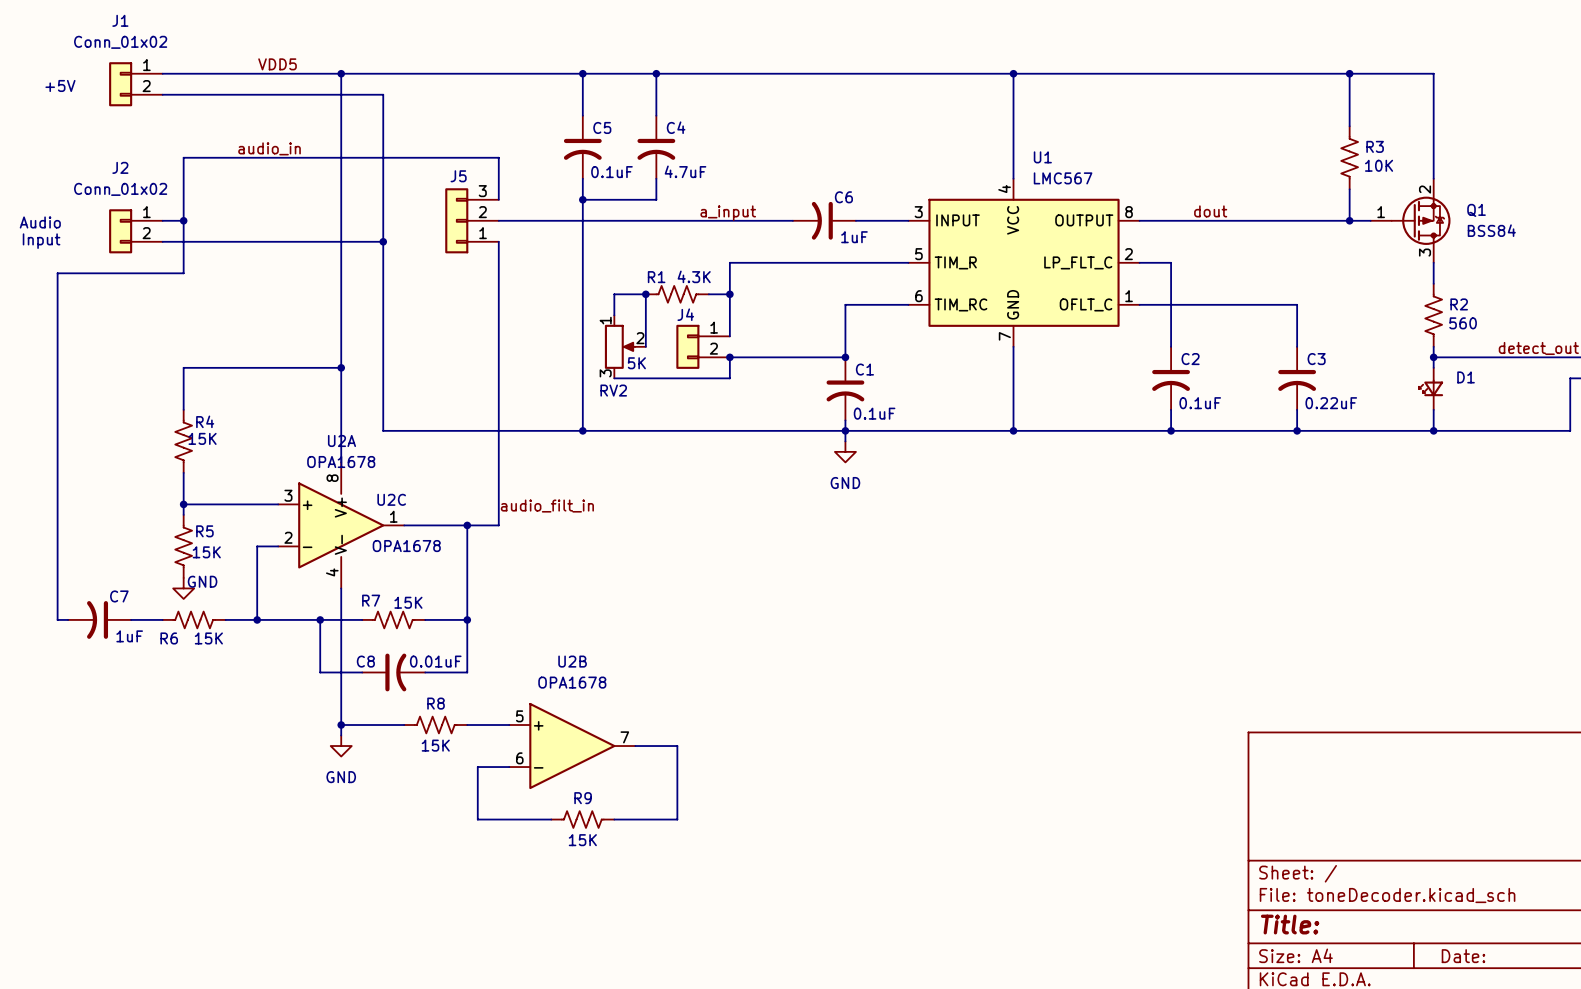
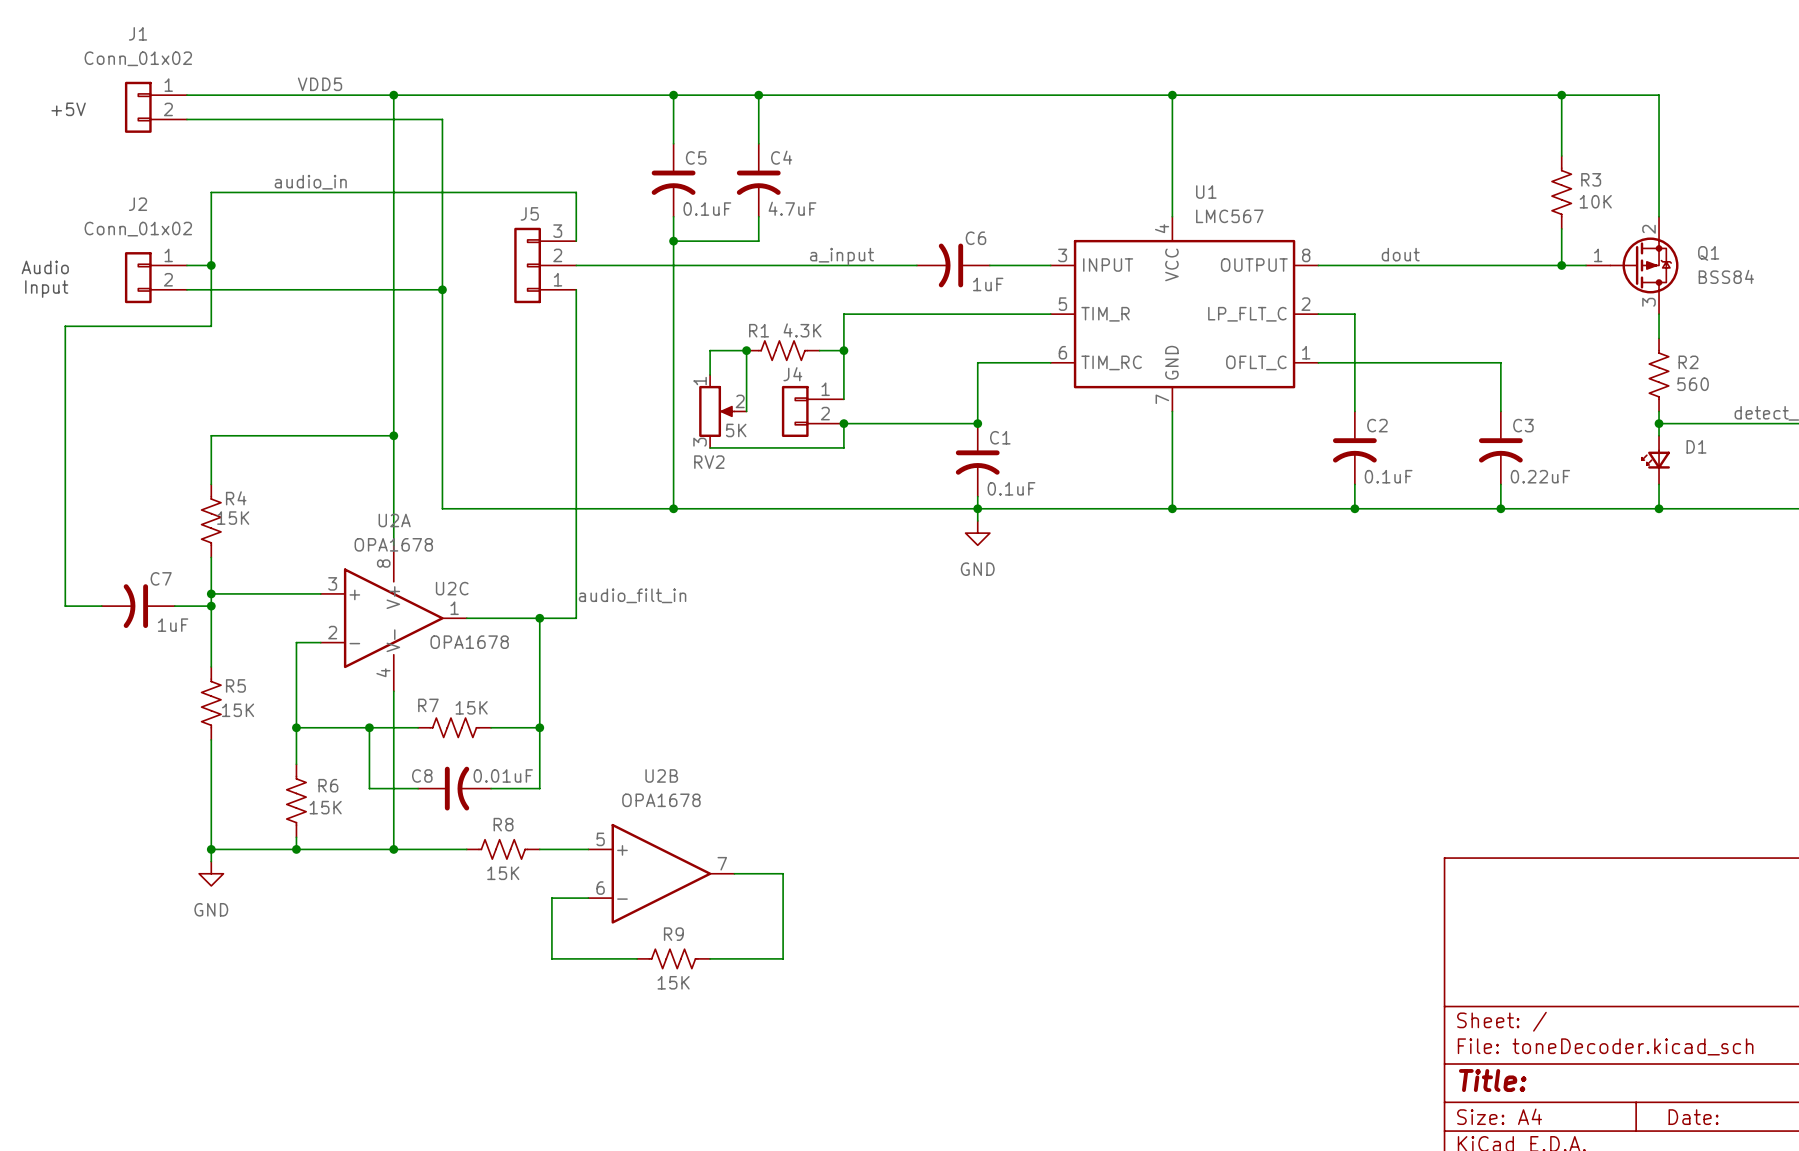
wire: (57, 514) (57, 619) (68, 619) -> (65, 606) (101, 606)
wire: none -> (174, 606) (211, 606) (211, 666)
junction: none -> (211, 606)
R5 position: (183, 546) -> (211, 703)
power symbol: GND (183, 588) -> none
C7 position: (99, 619) -> (138, 606)
wire: (131, 619) (162, 619) -> none
R6 rotation: 0° (194, 619) -> 90° clockwise (296, 800)
R6 position: (194, 619) -> (296, 800)
wire: (225, 619) (257, 619) -> (296, 764) (296, 727)
wire: none -> (211, 739) (211, 861)
R6 name position: R6 (169, 638) -> R6 (328, 785)
wire: none -> (296, 837) (296, 849)
junction: none -> (211, 849)
junction: none -> (296, 849)
wire: (341, 725) (341, 735) -> (393, 849) (211, 849)
power symbol: none -> GND (211, 873)
power symbol: GND (341, 746) -> none

